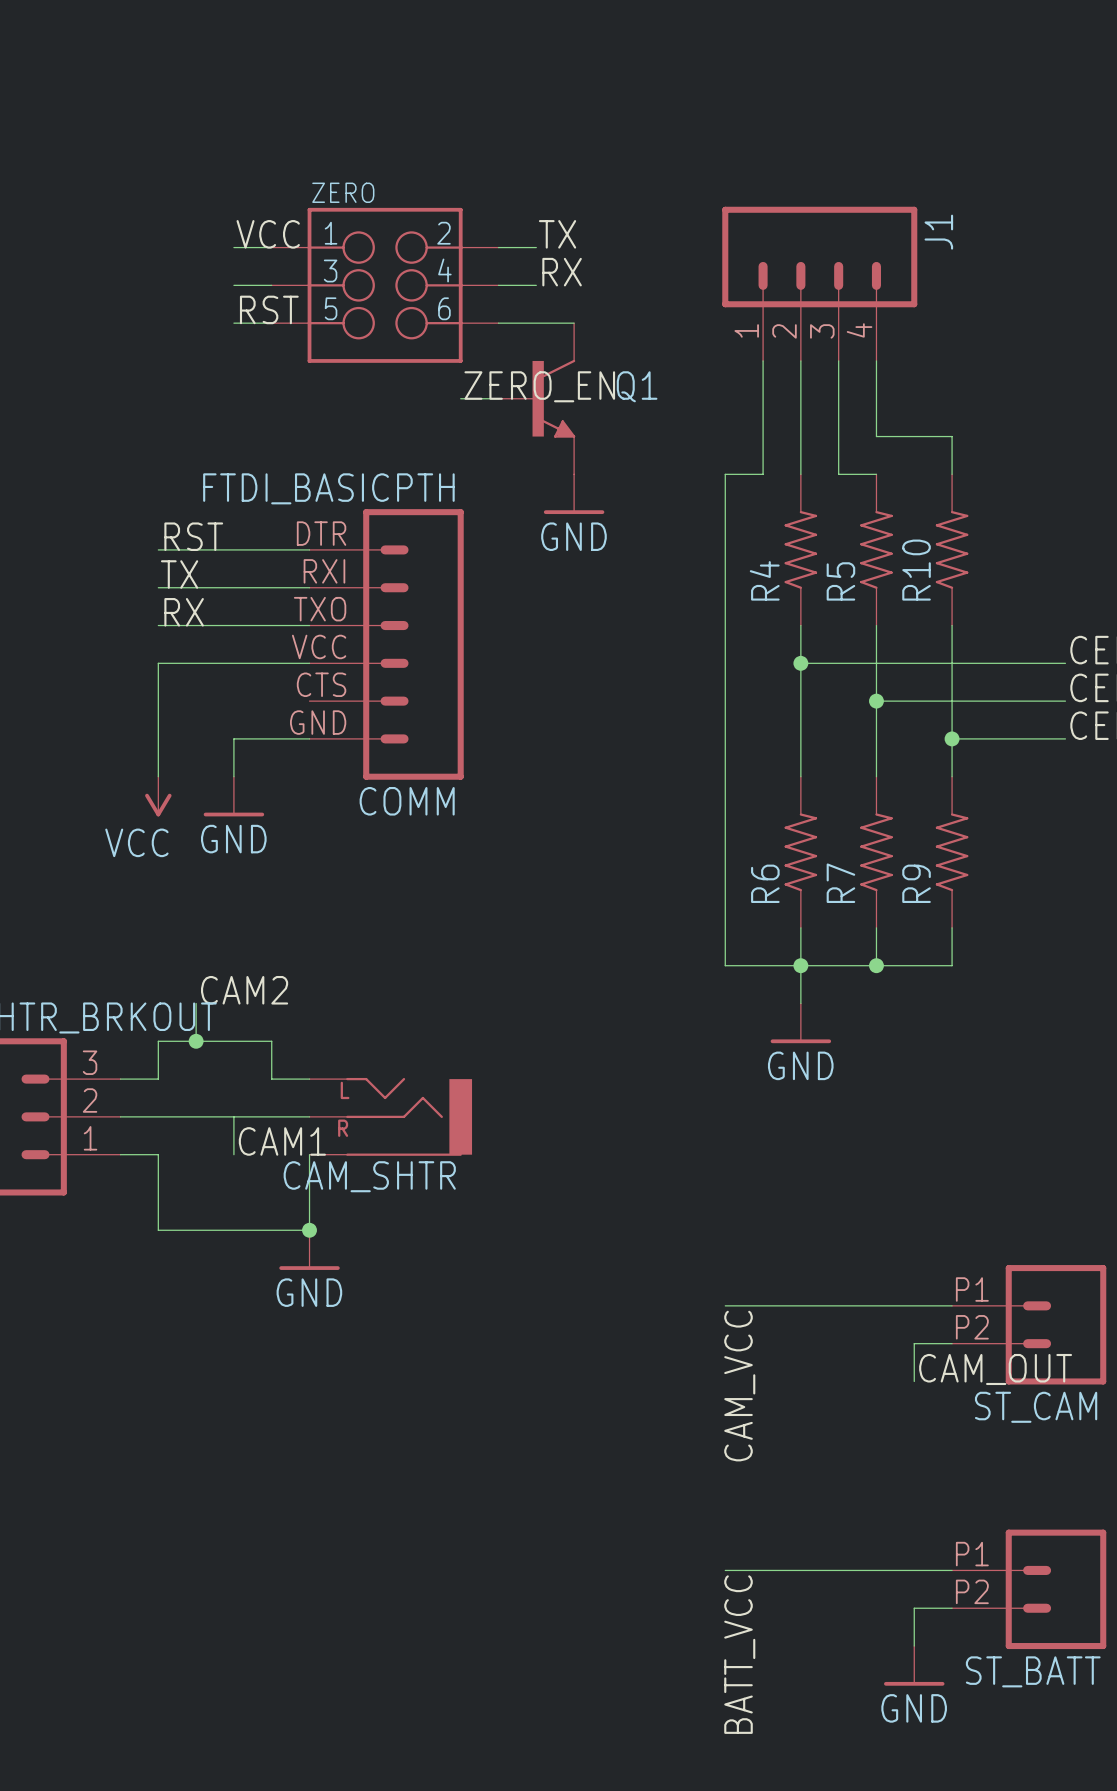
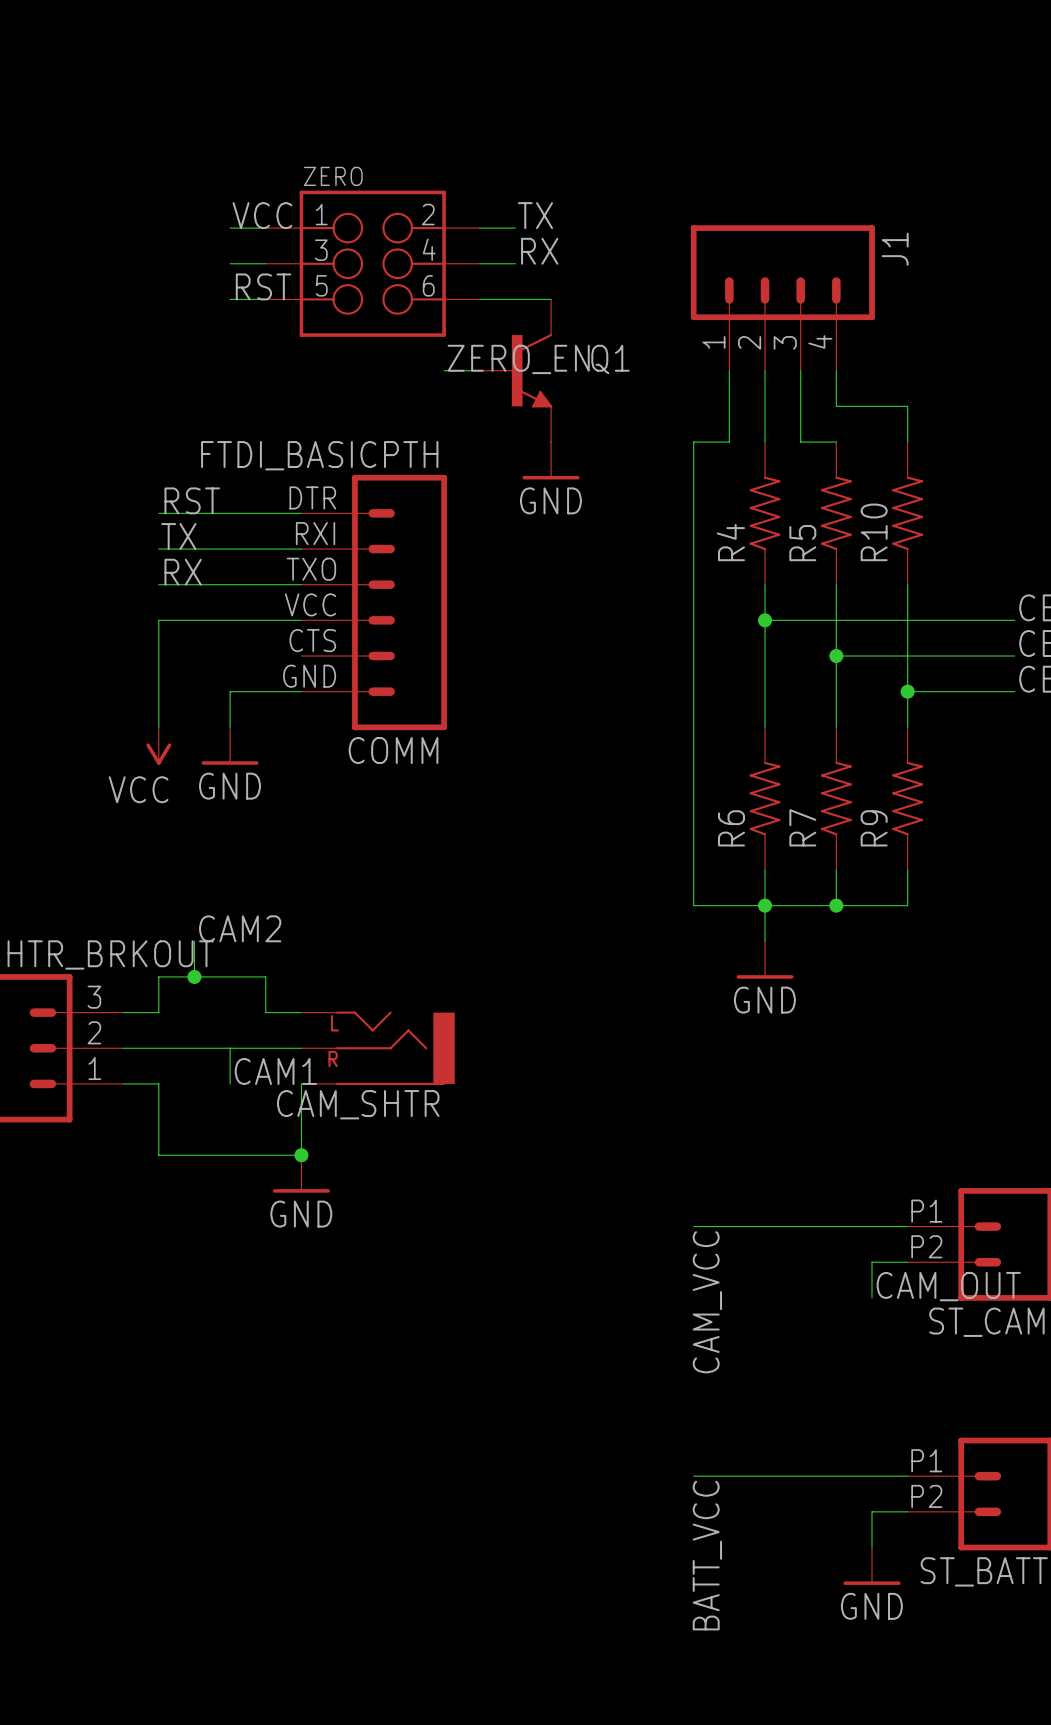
J1 position: (819, 283) -> (782, 297)

